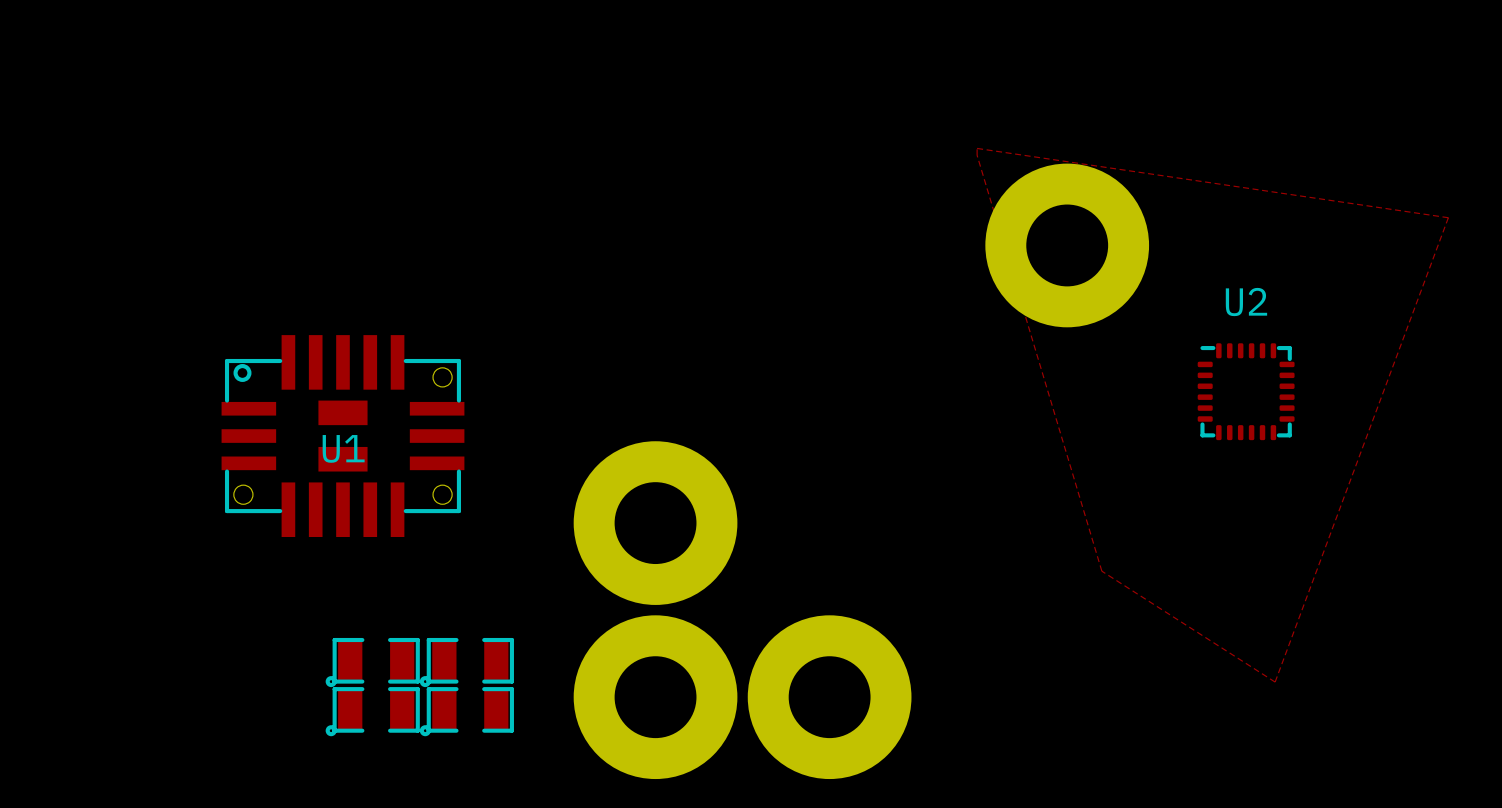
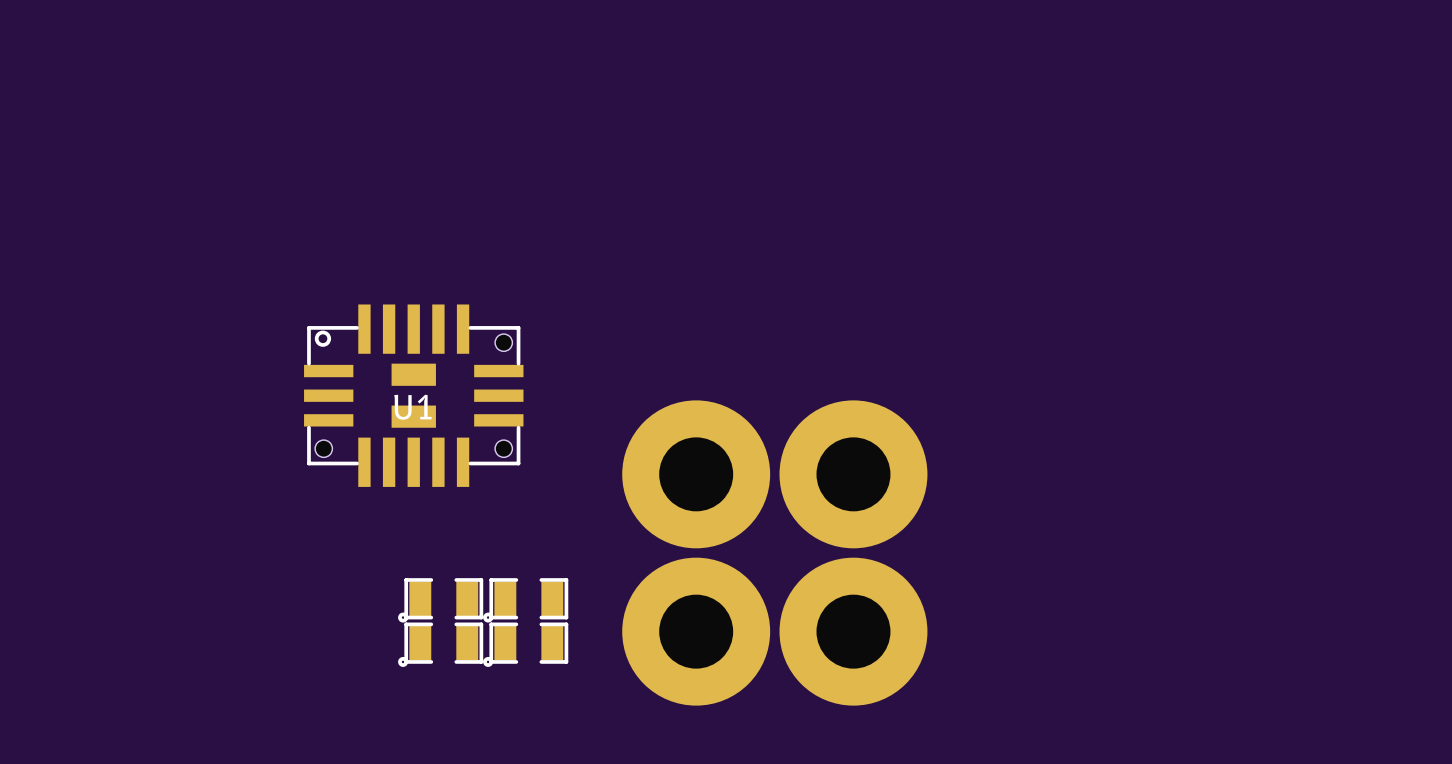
zone outline: (977, 148) (1448, 217) (1275, 682) (1101, 571) (977, 155) (977, 148) -> none
part position: (1067, 245) -> (853, 474)
U2: (1246, 391) -> none

